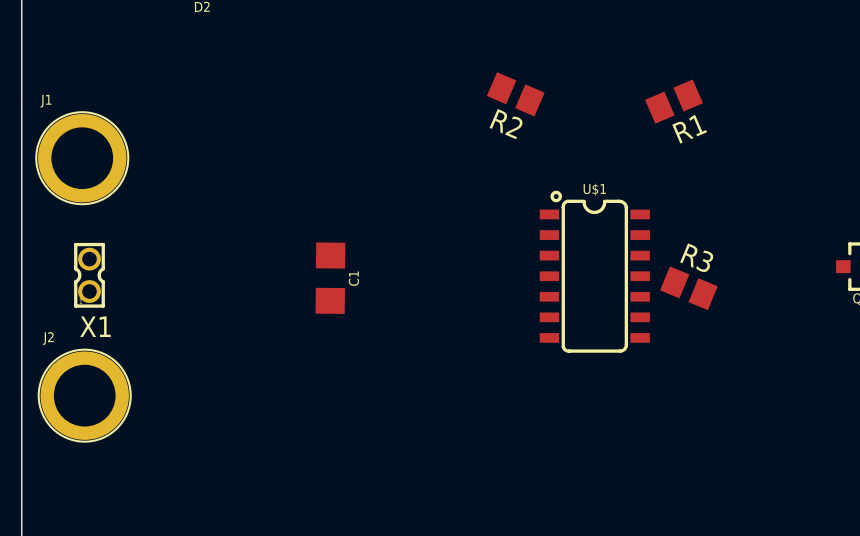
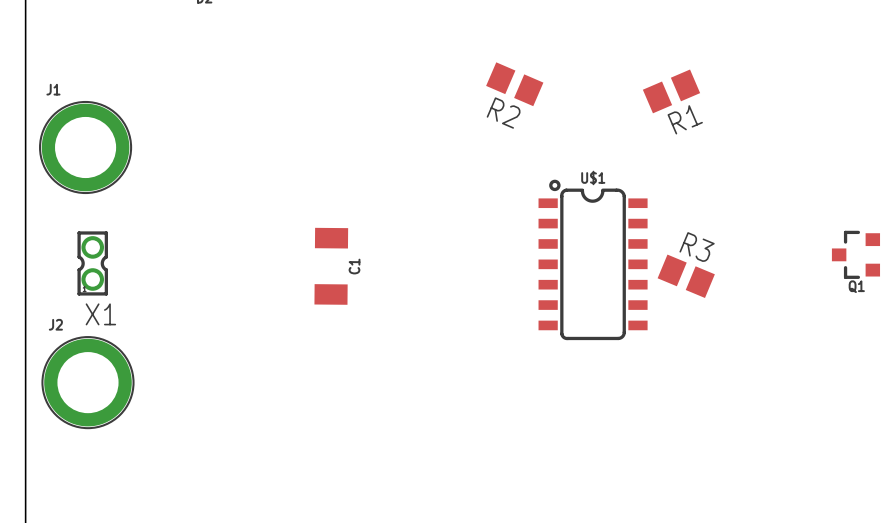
C1 footprint: [315, 242, 346, 314] -> [314, 227, 349, 305]

